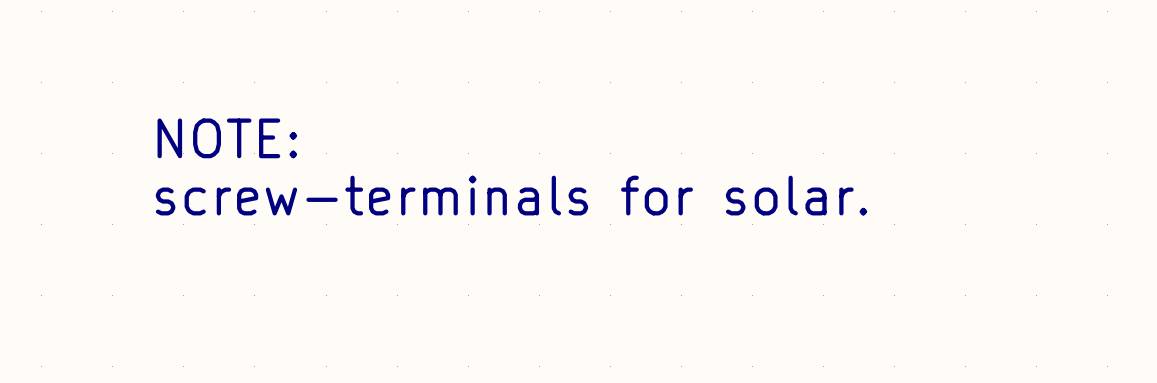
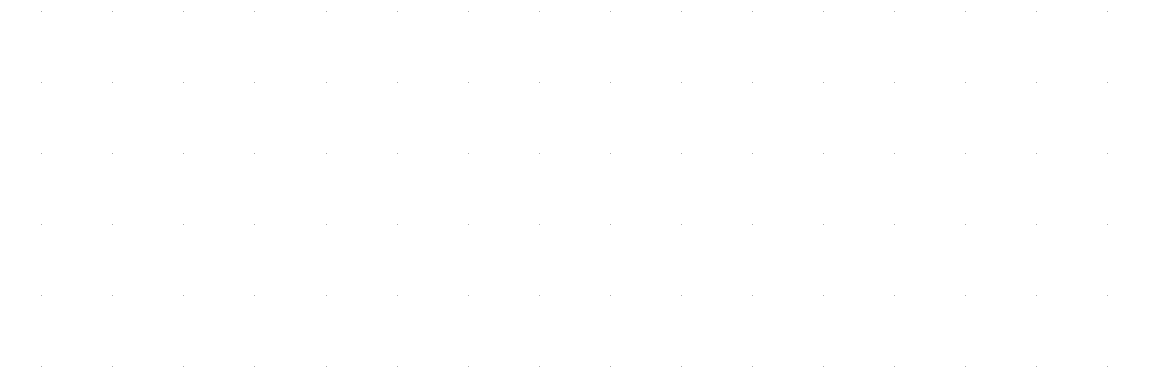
text: NOTE: (227, 138) -> none
text: screw-terminals for solar. (511, 195) -> none

